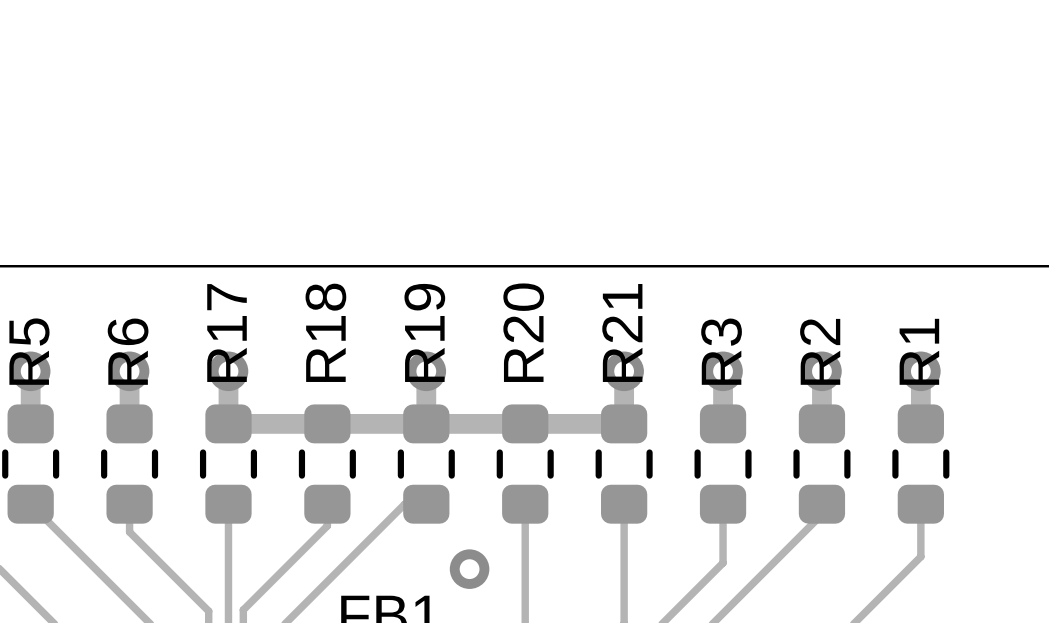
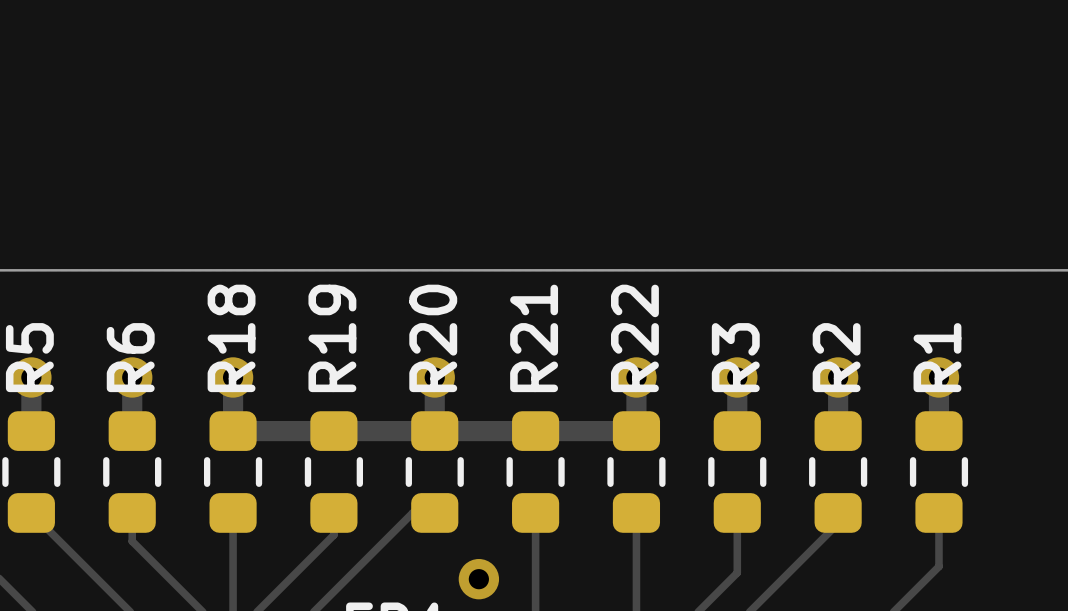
R18 name: R18 (325, 332) -> R19 (332, 338)
R19 name: R19 (424, 332) -> R20 (433, 338)
R20 name: R20 (523, 332) -> R21 (534, 338)
R21 name: R21 (622, 332) -> R22 (634, 338)
R17 name: R17 (227, 333) -> R18 (231, 338)

